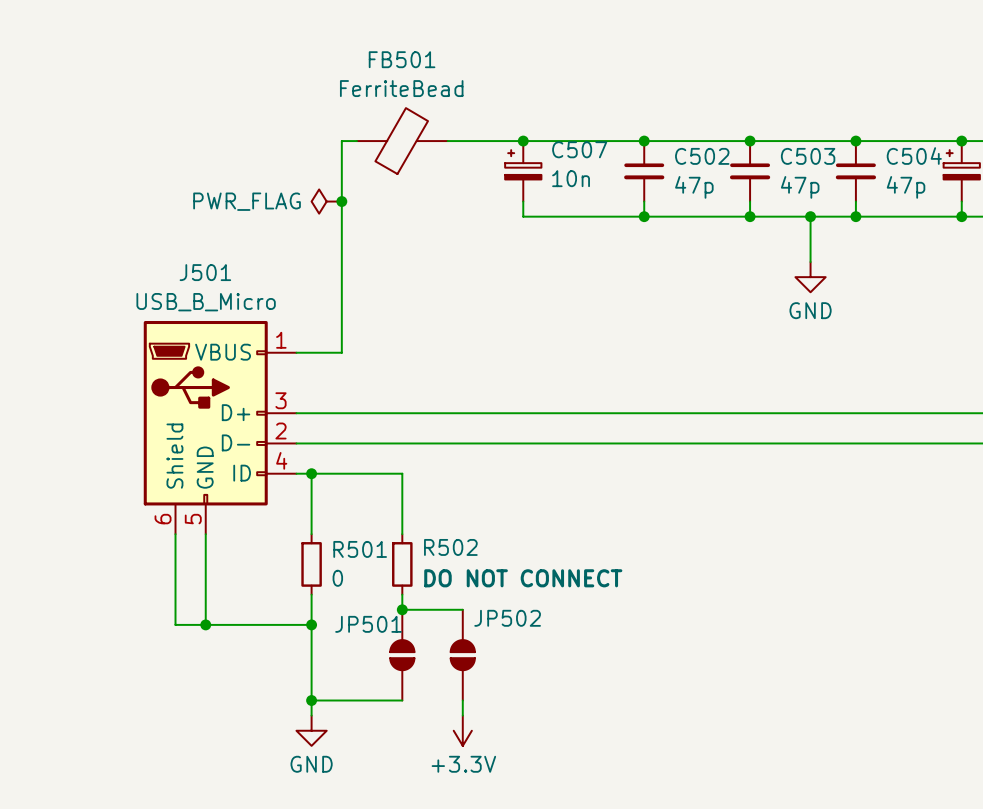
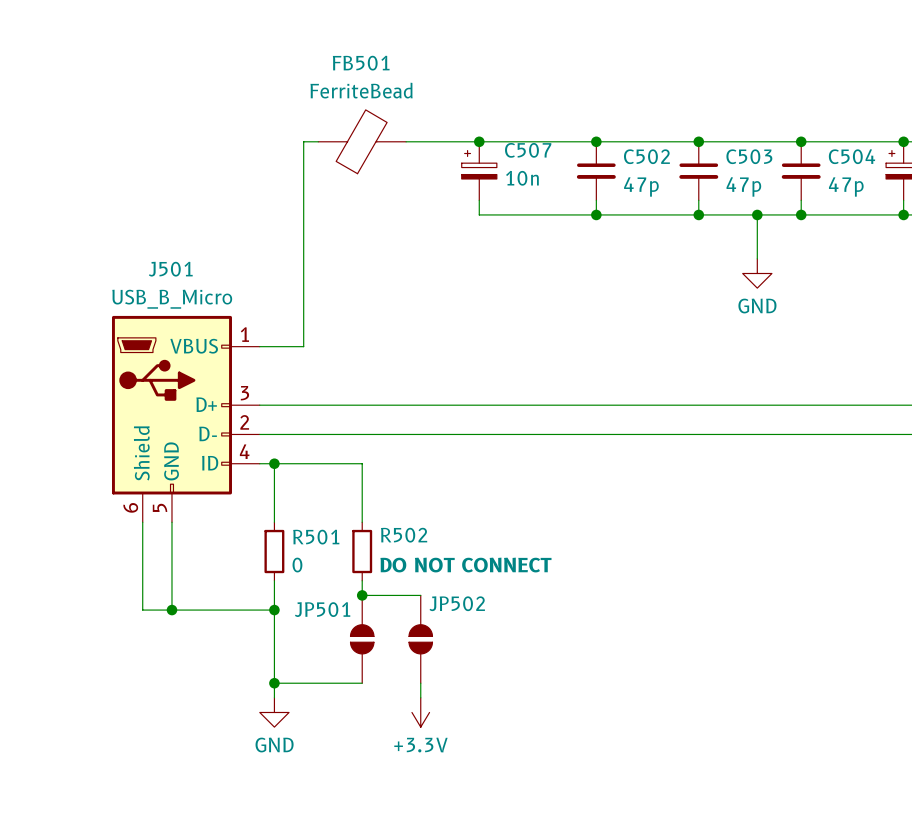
power symbol: PWR_FLAG (326, 201) -> none
junction: (341, 201) -> none

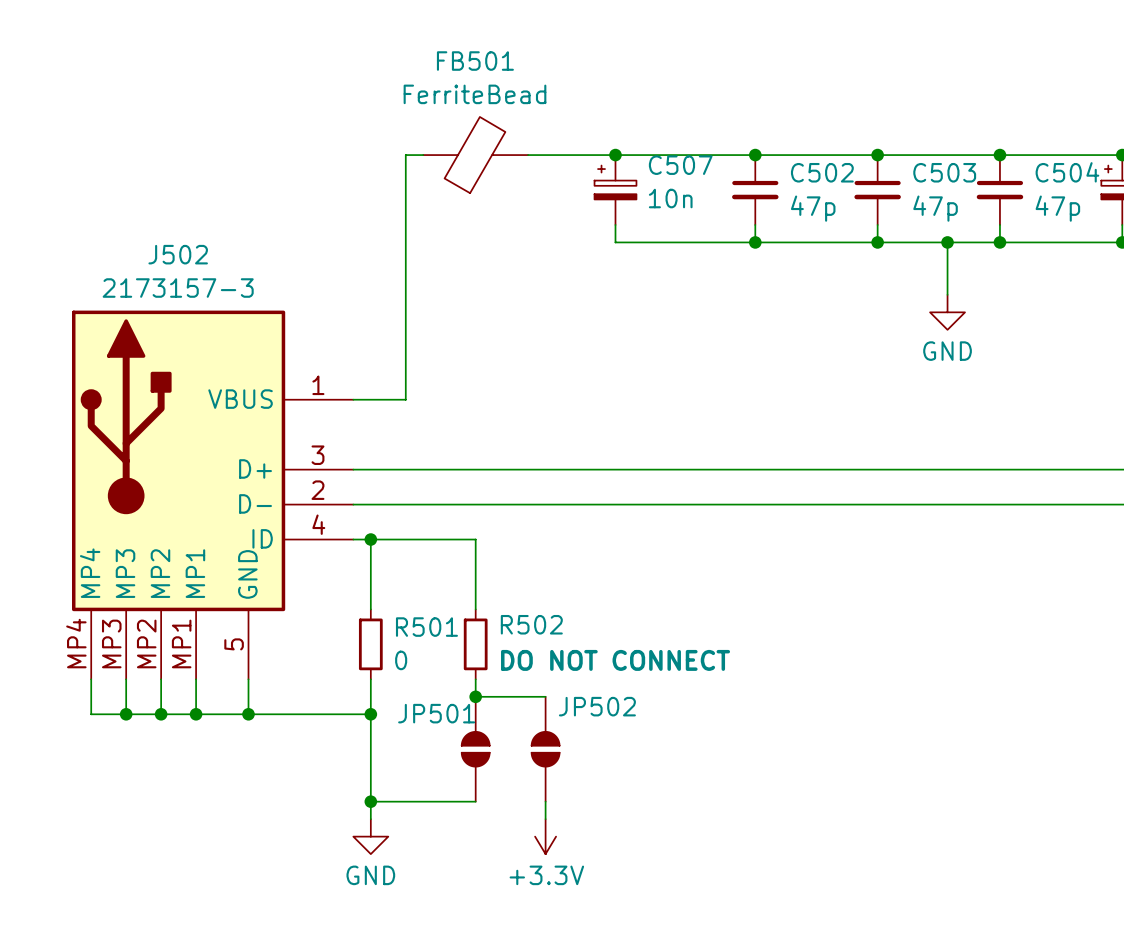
J501: USB_B_Micro (185, 419) -> none
J502: none -> 2173157-3 (212, 494)
wire: (142, 522) (142, 610) -> (91, 679) (91, 714) (213, 714)
wire: none -> (126, 679) (126, 714)
wire: none -> (161, 679) (161, 714)
wire: none -> (196, 679) (196, 714)
junction: none -> (126, 714)
junction: none -> (161, 714)
junction: none -> (196, 714)

